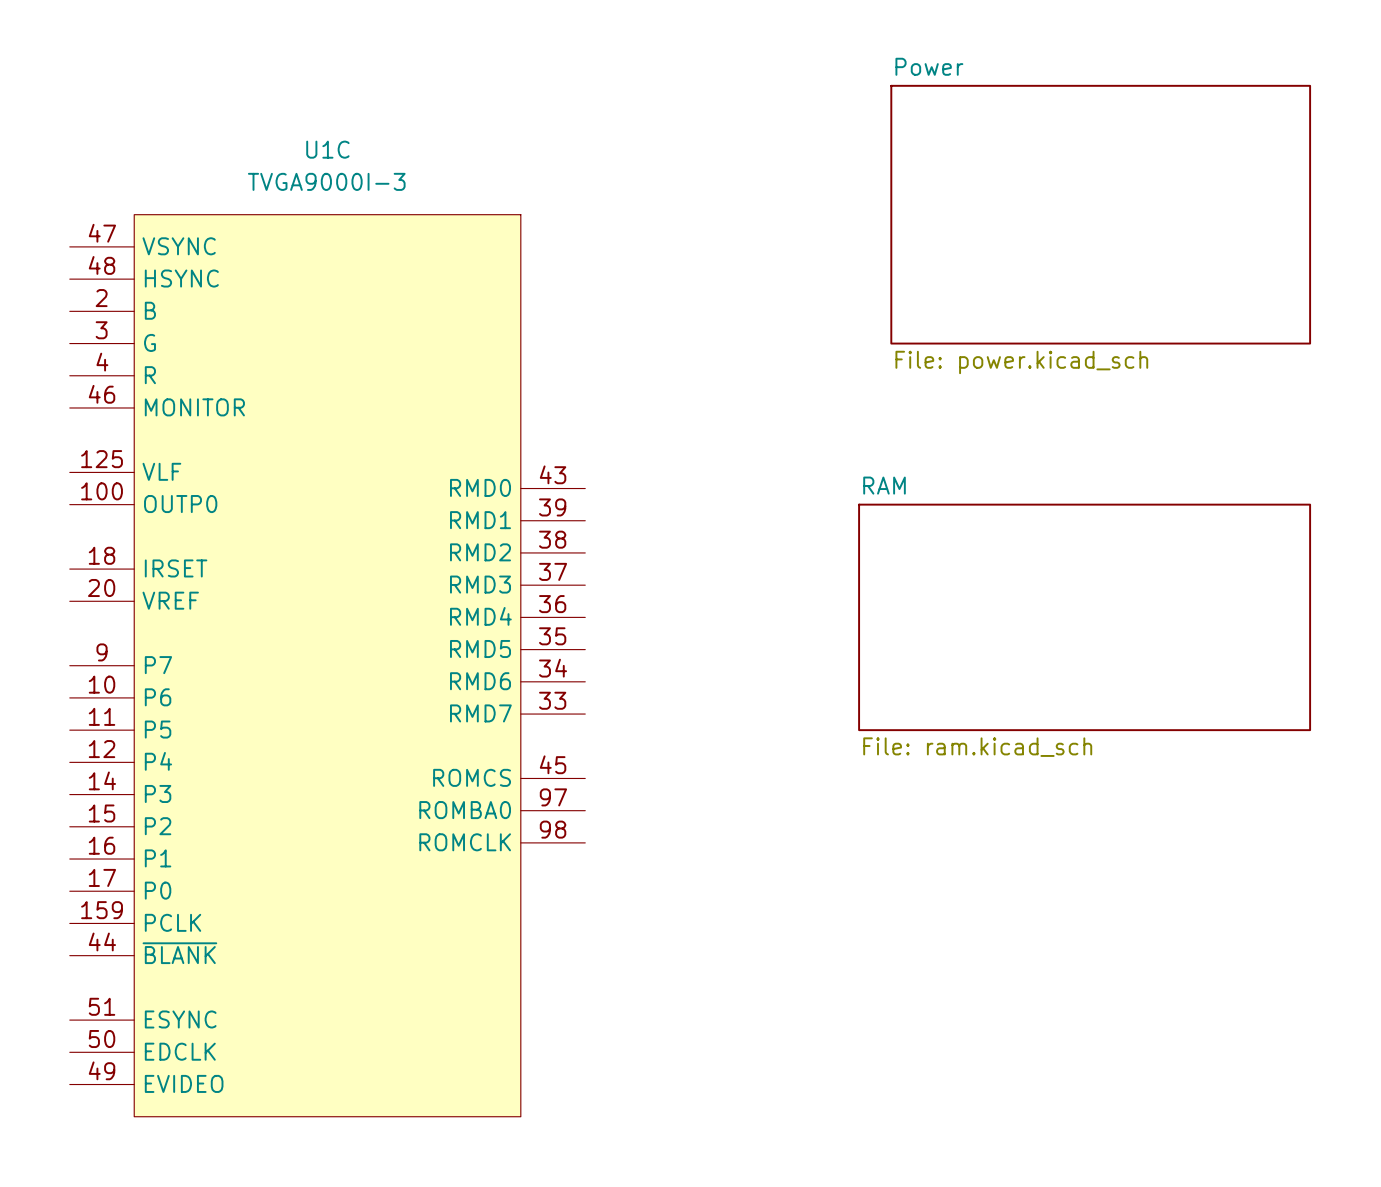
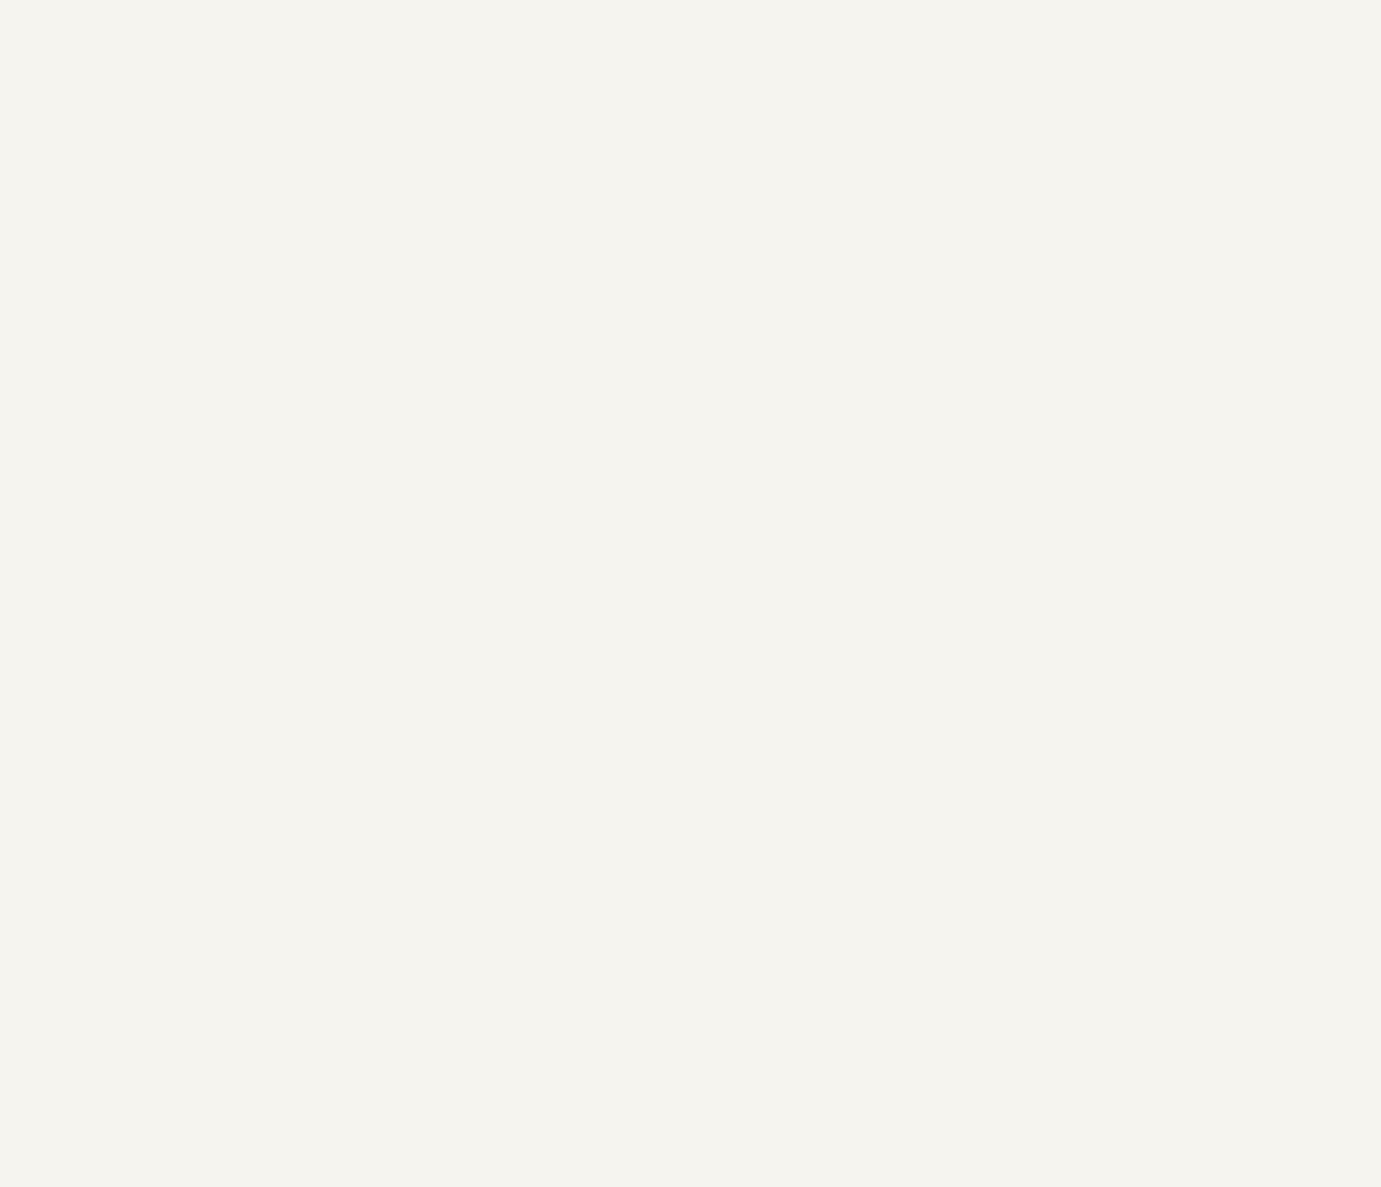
sheet Power: File: power.kicad_sch (1100, 214) -> none
sheet RAM: File: ram.kicad_sch (1084, 617) -> none
U1C: TVGA9000I-3 (327, 665) -> none

